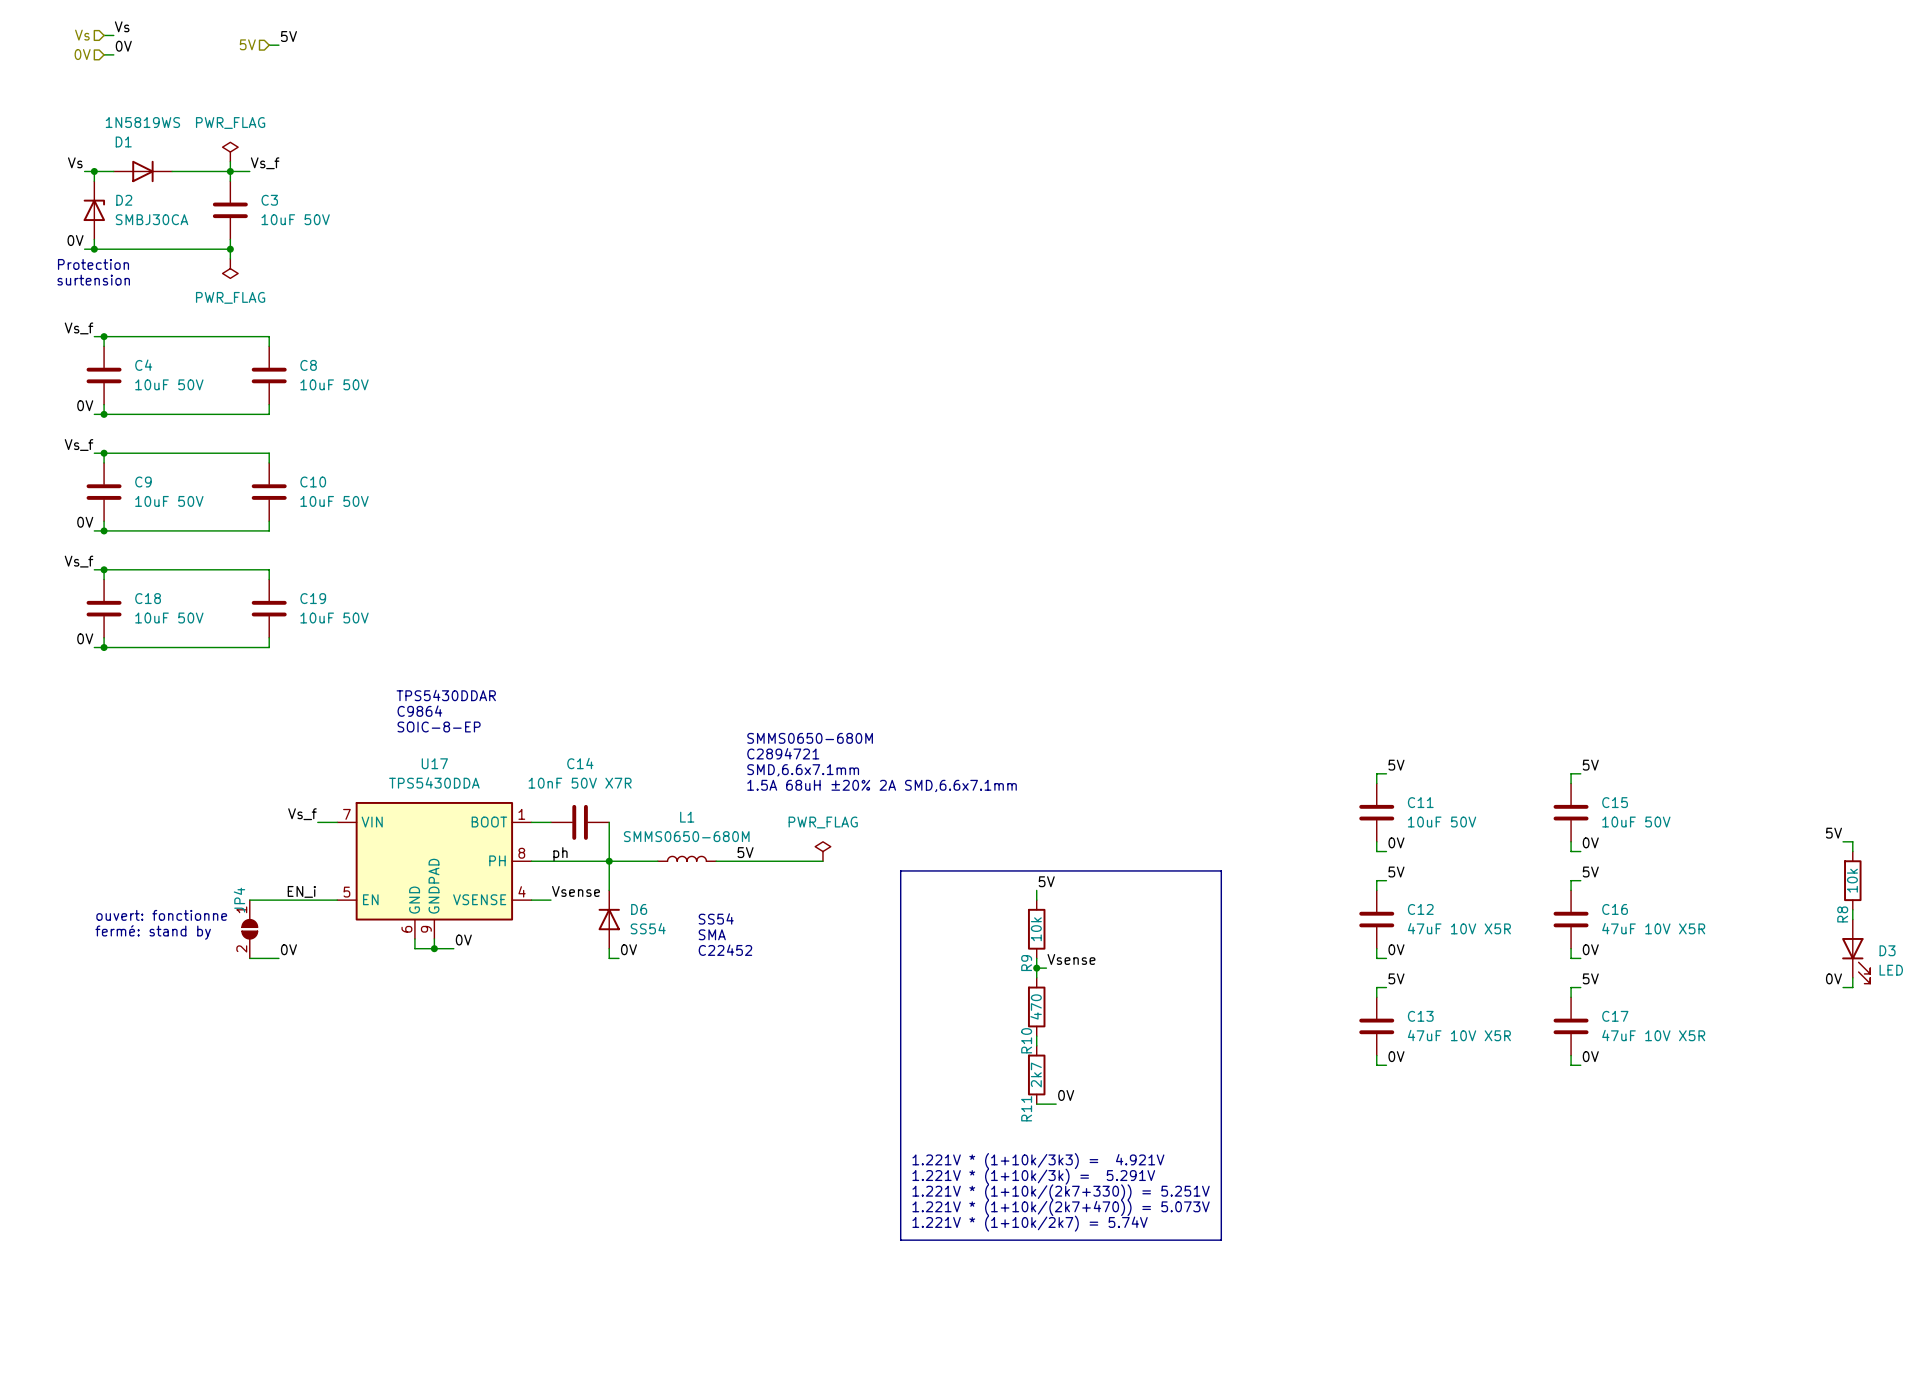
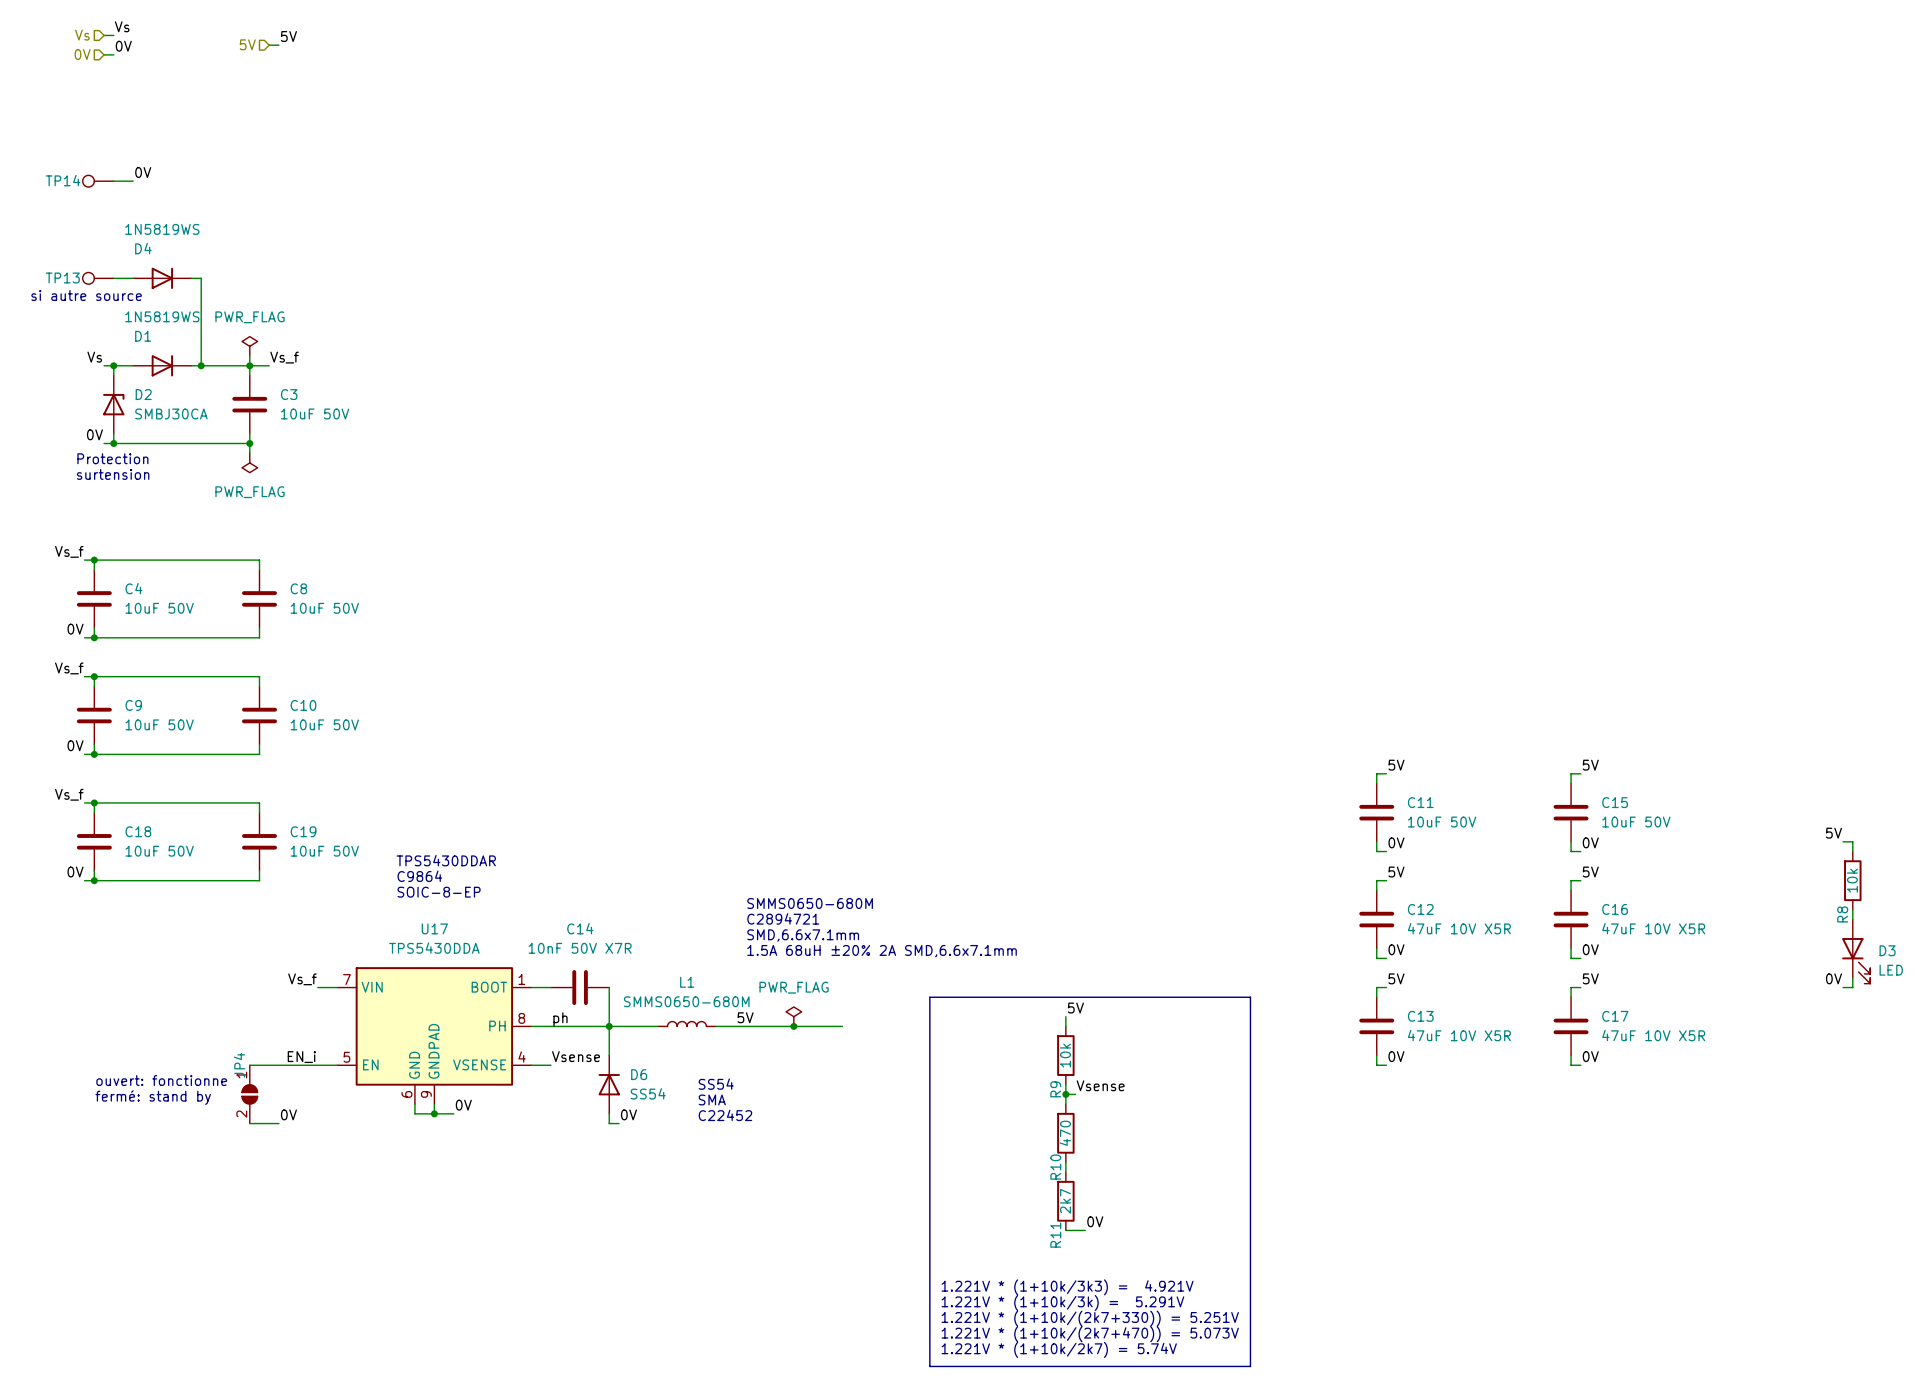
power symbol: PWR_FLAG (230, 152) -> none
wire: (230, 161) (230, 181) -> none
label: Vs (75, 162) -> none
label: Vs_f (265, 163) -> none
wire: (84, 171) (113, 171) -> none
wire: (94, 171) (94, 181) -> none
junction: (94, 171) -> none
D1 position: (142, 171) -> (162, 365)
wire: (172, 171) (249, 171) -> none
junction: (230, 171) -> none
TP14: none -> (98, 181)
wire: none -> (113, 181) (133, 181)
D2 position: (94, 210) -> (113, 404)
C3 position: (230, 210) -> (249, 404)
wire: (94, 239) (94, 249) -> none
wire: (230, 239) (230, 258) -> (249, 356) (249, 375)
label position: 0V (75, 240) -> 0V (143, 172)
wire: (84, 249) (230, 249) -> none
junction: (94, 249) -> none
junction: (230, 249) -> none
text: Protection (93, 264) -> none
power symbol rotation: 0° (230, 268) -> 180° (249, 346)
power symbol position: PWR_FLAG (230, 268) -> PWR_FLAG (249, 346)
TP13: none -> (98, 278)
wire: none -> (113, 278) (133, 278)
D4: none -> 1N5819WS (162, 278)
wire: none -> (191, 278) (201, 278) (201, 365)
text: surtension (93, 280) -> none
text: none -> si autre source (86, 295)
label: Vs_f (79, 328) -> none
wire: (94, 336) (269, 336) (269, 346) -> none
wire: (104, 336) (104, 346) -> (113, 365) (113, 375)
junction: (104, 336) -> none
label: none -> Vs (94, 357)
label: none -> Vs_f (284, 357)
wire: none -> (104, 365) (133, 365)
junction: none -> (113, 365)
wire: none -> (191, 365) (269, 365)
junction: none -> (201, 365)
junction: none -> (249, 365)
C4 position: (104, 375) -> (94, 598)
C8 position: (269, 375) -> (259, 598)
wire: (104, 404) (104, 414) -> (113, 433) (113, 443)
wire: (269, 404) (269, 414) (94, 414) -> none
label position: 0V (85, 405) -> 0V (94, 434)
junction: (104, 414) -> none
wire: none -> (249, 433) (249, 453)
wire: none -> (104, 443) (249, 443)
junction: none -> (249, 443)
label: Vs_f (79, 445) -> none
wire: (94, 453) (269, 453) (269, 462) -> (84, 560) (259, 560) (259, 569)
wire: (104, 453) (104, 462) -> none
junction position: (104, 453) -> (113, 443)
text: none -> Protection (112, 458)
power symbol: none -> PWR_FLAG (249, 462)
text: none -> surtension (113, 474)
C9 position: (104, 492) -> (94, 715)
C10 position: (269, 492) -> (259, 715)
wire: (104, 521) (104, 530) -> (94, 628) (94, 637)
wire: (269, 521) (269, 530) (94, 530) -> (259, 628) (259, 637) (84, 637)
label: 0V (85, 522) -> none
junction: (104, 530) -> none
label position: Vs_f (79, 561) -> Vs_f (69, 551)
wire: (94, 569) (269, 569) (269, 579) -> (94, 569) (94, 560)
wire: (104, 569) (104, 579) -> (94, 676) (94, 686)
junction position: (104, 569) -> (94, 560)
C18 position: (104, 608) -> (94, 841)
C19 position: (269, 608) -> (259, 841)
wire: (104, 637) (104, 647) -> (94, 744) (94, 754)
wire: (269, 637) (269, 647) (94, 647) -> (259, 744) (259, 754) (84, 754)
label position: 0V (85, 638) -> 0V (75, 629)
junction position: (104, 647) -> (94, 637)
label: none -> Vs_f (69, 668)
wire: none -> (84, 676) (259, 676) (259, 686)
junction: none -> (94, 676)
text position: TPS5430DDAR (446, 695) -> TPS5430DDAR (446, 860)
text position: C9864 (419, 711) -> C9864 (419, 876)
text position: SOIC-8-EP (439, 727) -> SOIC-8-EP (439, 892)
text position: SMMS0650-680M (810, 738) -> SMMS0650-680M (810, 903)
label: none -> 0V (75, 745)
text position: C2894721 (783, 753) -> C2894721 (783, 918)
junction: none -> (94, 754)
text position: SMD,6.6x7.1mm (803, 770) -> SMD,6.6x7.1mm (803, 935)
text position: 1.5A 68uH ±20% 2A SMD,6.6x7.1mm (882, 785) -> 1.5A 68uH ±20% 2A SMD,6.6x7.1mm (882, 951)
label: none -> Vs_f (69, 794)
wire: none -> (84, 802) (259, 802) (259, 812)
wire: none -> (94, 802) (94, 812)
junction: none -> (94, 802)
label: Vs_f (302, 814) -> none
wire: (317, 822) (337, 822) -> (317, 987) (337, 987)
wire: (531, 822) (550, 822) -> (531, 987) (550, 987)
C14 position: (580, 822) -> (580, 987)
wire: (609, 822) (609, 890) -> (609, 987) (609, 1055)
power symbol position: PWR_FLAG (822, 851) -> PWR_FLAG (793, 1016)
label: 5V (745, 852) -> none
label position: ph (560, 854) -> ph (560, 1019)
L1 position: (686, 858) -> (686, 1023)
wire: (531, 861) (657, 861) -> (531, 1026) (657, 1026)
junction: (609, 861) -> none
wire: (716, 861) (822, 861) -> none
wire: none -> (94, 870) (94, 880)
wire: none -> (259, 870) (259, 880) (84, 880)
U17 position: (434, 870) -> (434, 1035)
line: (900, 870) (1221, 870) (1221, 1240) (900, 1240) (900, 870) -> (929, 997) (1250, 997) (1250, 1366) (929, 1366) (929, 997)
label: none -> 0V (75, 872)
junction: none -> (94, 880)
label position: 5V (1046, 881) -> 5V (1075, 1008)
wire: (1036, 890) (1036, 900) -> (1065, 1016) (1065, 1026)
label position: EN_i (301, 891) -> EN_i (301, 1057)
label position: Vsense (576, 891) -> Vsense (576, 1056)
wire: (249, 900) (337, 900) -> (249, 1065) (337, 1065)
wire: (531, 900) (550, 900) -> (531, 1065) (550, 1065)
text position: ouvert: fonctionne (161, 915) -> ouvert: fonctionne (161, 1080)
text position: SS54 (716, 918) -> SS54 (716, 1084)
D6 position: (609, 919) -> (609, 1084)
JP4 position: (249, 929) -> (249, 1094)
R9 position: (1036, 929) -> (1065, 1055)
text position: fermé: stand by (153, 932) -> fermé: stand by (153, 1097)
text position: SMA (712, 934) -> SMA (712, 1099)
wire: (414, 938) (414, 948) (453, 948) -> (414, 1104) (414, 1113) (453, 1113)
wire: (434, 938) (434, 948) -> (434, 1104) (434, 1113)
label: 0V (463, 940) -> none
junction: (434, 948) -> none
wire: (609, 948) (609, 958) (618, 958) -> (609, 1113) (609, 1123) (618, 1123)
label: 0V (288, 949) -> none
label: 0V (628, 949) -> none
text position: C22452 (725, 950) -> C22452 (725, 1115)
wire: (249, 958) (278, 958) -> (249, 1123) (278, 1123)
wire: (1036, 958) (1036, 977) -> (1065, 1084) (1065, 1104)
label position: Vsense (1071, 959) -> Vsense (1100, 1085)
wire: (1036, 968) (1046, 968) -> (1065, 1094) (1075, 1094)
junction: (1036, 968) -> none
label: none -> Vs_f (302, 979)
R10 position: (1036, 1006) -> (1065, 1133)
label: none -> 5V (745, 1017)
junction: none -> (609, 1026)
wire: none -> (716, 1026) (842, 1026)
junction: none -> (793, 1026)
wire: (1036, 1036) (1036, 1045) -> (1065, 1162) (1065, 1172)
R11 position: (1036, 1074) -> (1065, 1201)
junction: none -> (1065, 1094)
label position: 0V (1066, 1095) -> 0V (1095, 1221)
wire: (1036, 1104) (1056, 1104) -> (1065, 1230) (1085, 1230)
label: none -> 0V (463, 1105)
junction: none -> (434, 1113)
label: none -> 0V (288, 1114)
label: none -> 0V (628, 1114)
text position: 1.221V * (1+10k/3k3) = 4.921V (1038, 1161) -> 1.221V * (1+10k/3k3) = 4.921V (1067, 1287)
text position: 1.221V * (1+10k/3k) = 5.291V (1033, 1176) -> 1.221V * (1+10k/3k) = 5.291V (1062, 1303)
text position: 1.221V * (1+10k/(2k7+330)) = 5.251V (1061, 1192) -> 1.221V * (1+10k/(2k7+330)) = 5.251V (1090, 1318)
text position: 1.221V * (1+10k/(2k7+470)) = 5.073V (1061, 1207) -> 1.221V * (1+10k/(2k7+470)) = 5.073V (1090, 1334)
text position: 1.221V * (1+10k/2k7) = 5.74V (1030, 1223) -> 1.221V * (1+10k/2k7) = 5.74V (1059, 1349)

